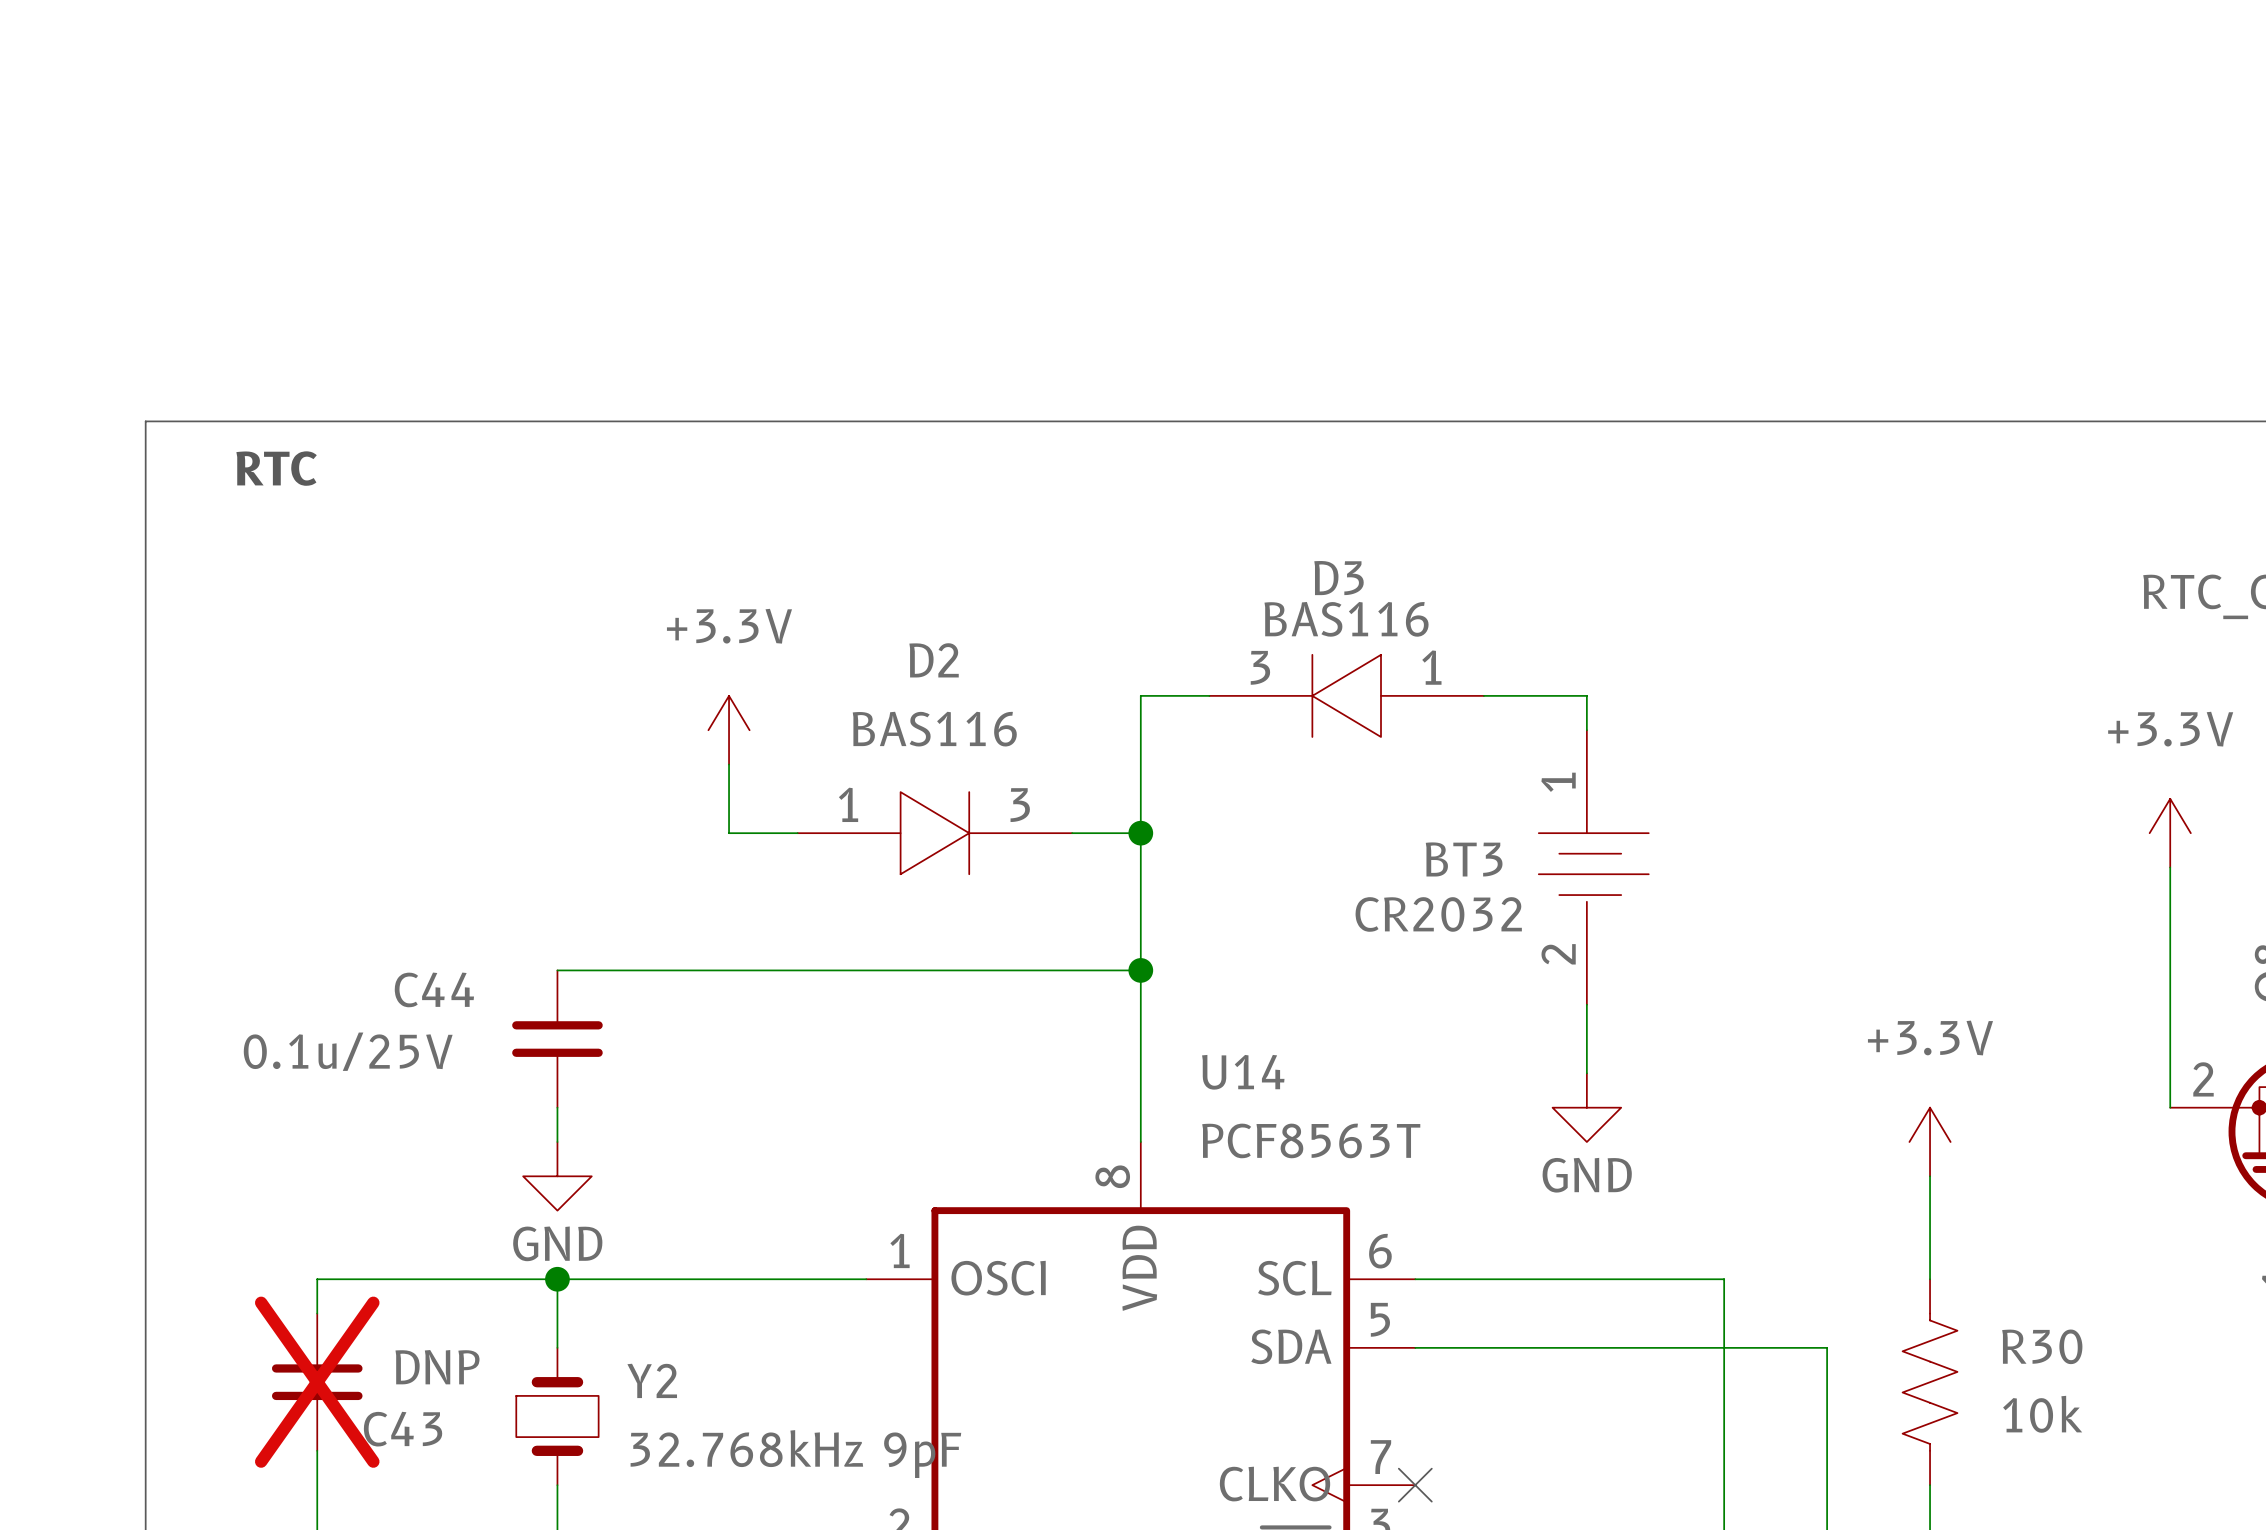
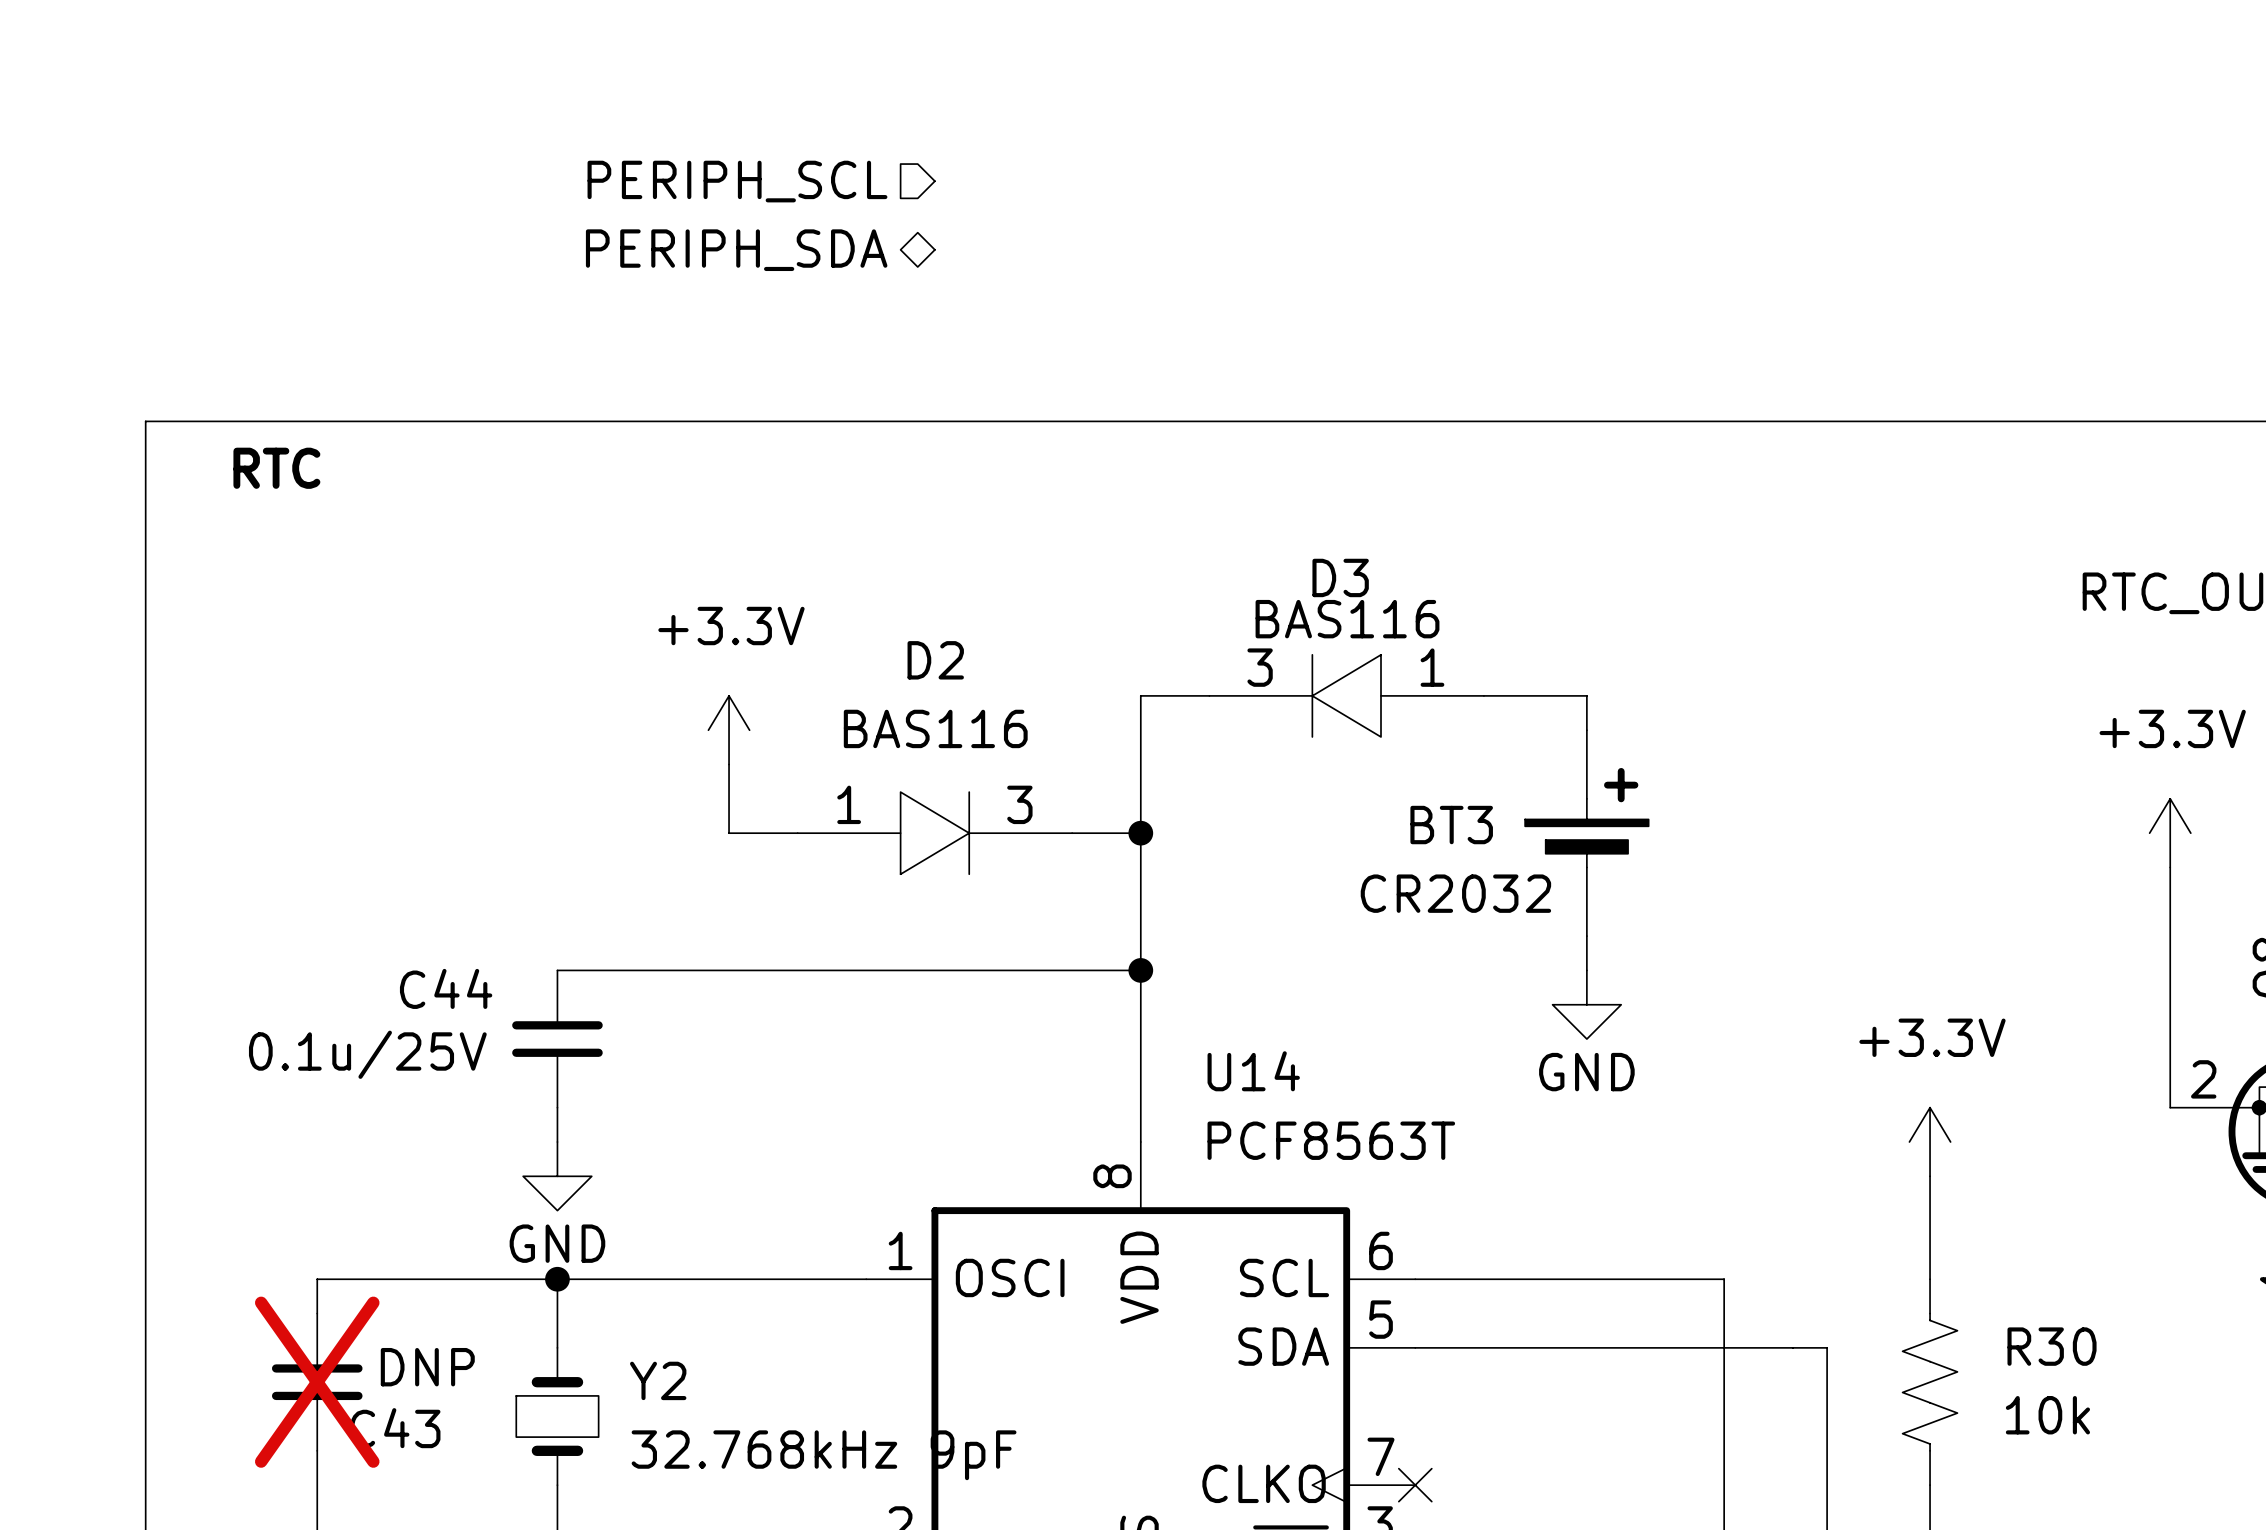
hierarchical label: none -> PERIPH_SCL (737, 181)
hierarchical label: none -> PERIPH_SDA (736, 250)
BT3 symbol: [1538, 730, 1649, 1005] -> [1525, 730, 1649, 937]
wire: (1586, 1004) (1586, 1073) -> none
power symbol position: GND (1586, 1107) -> GND (1586, 1004)

